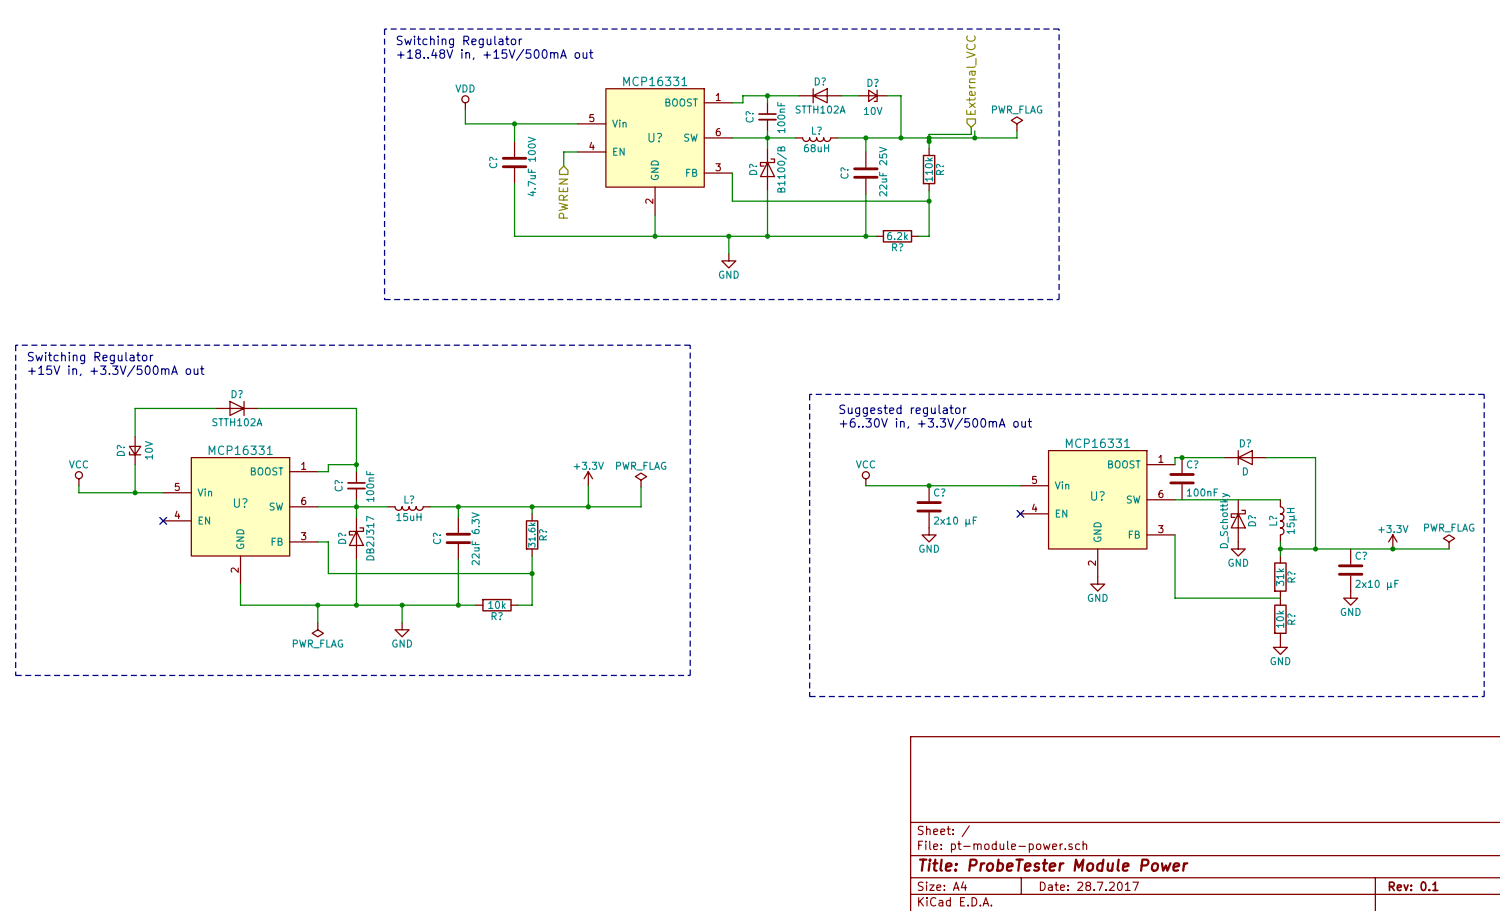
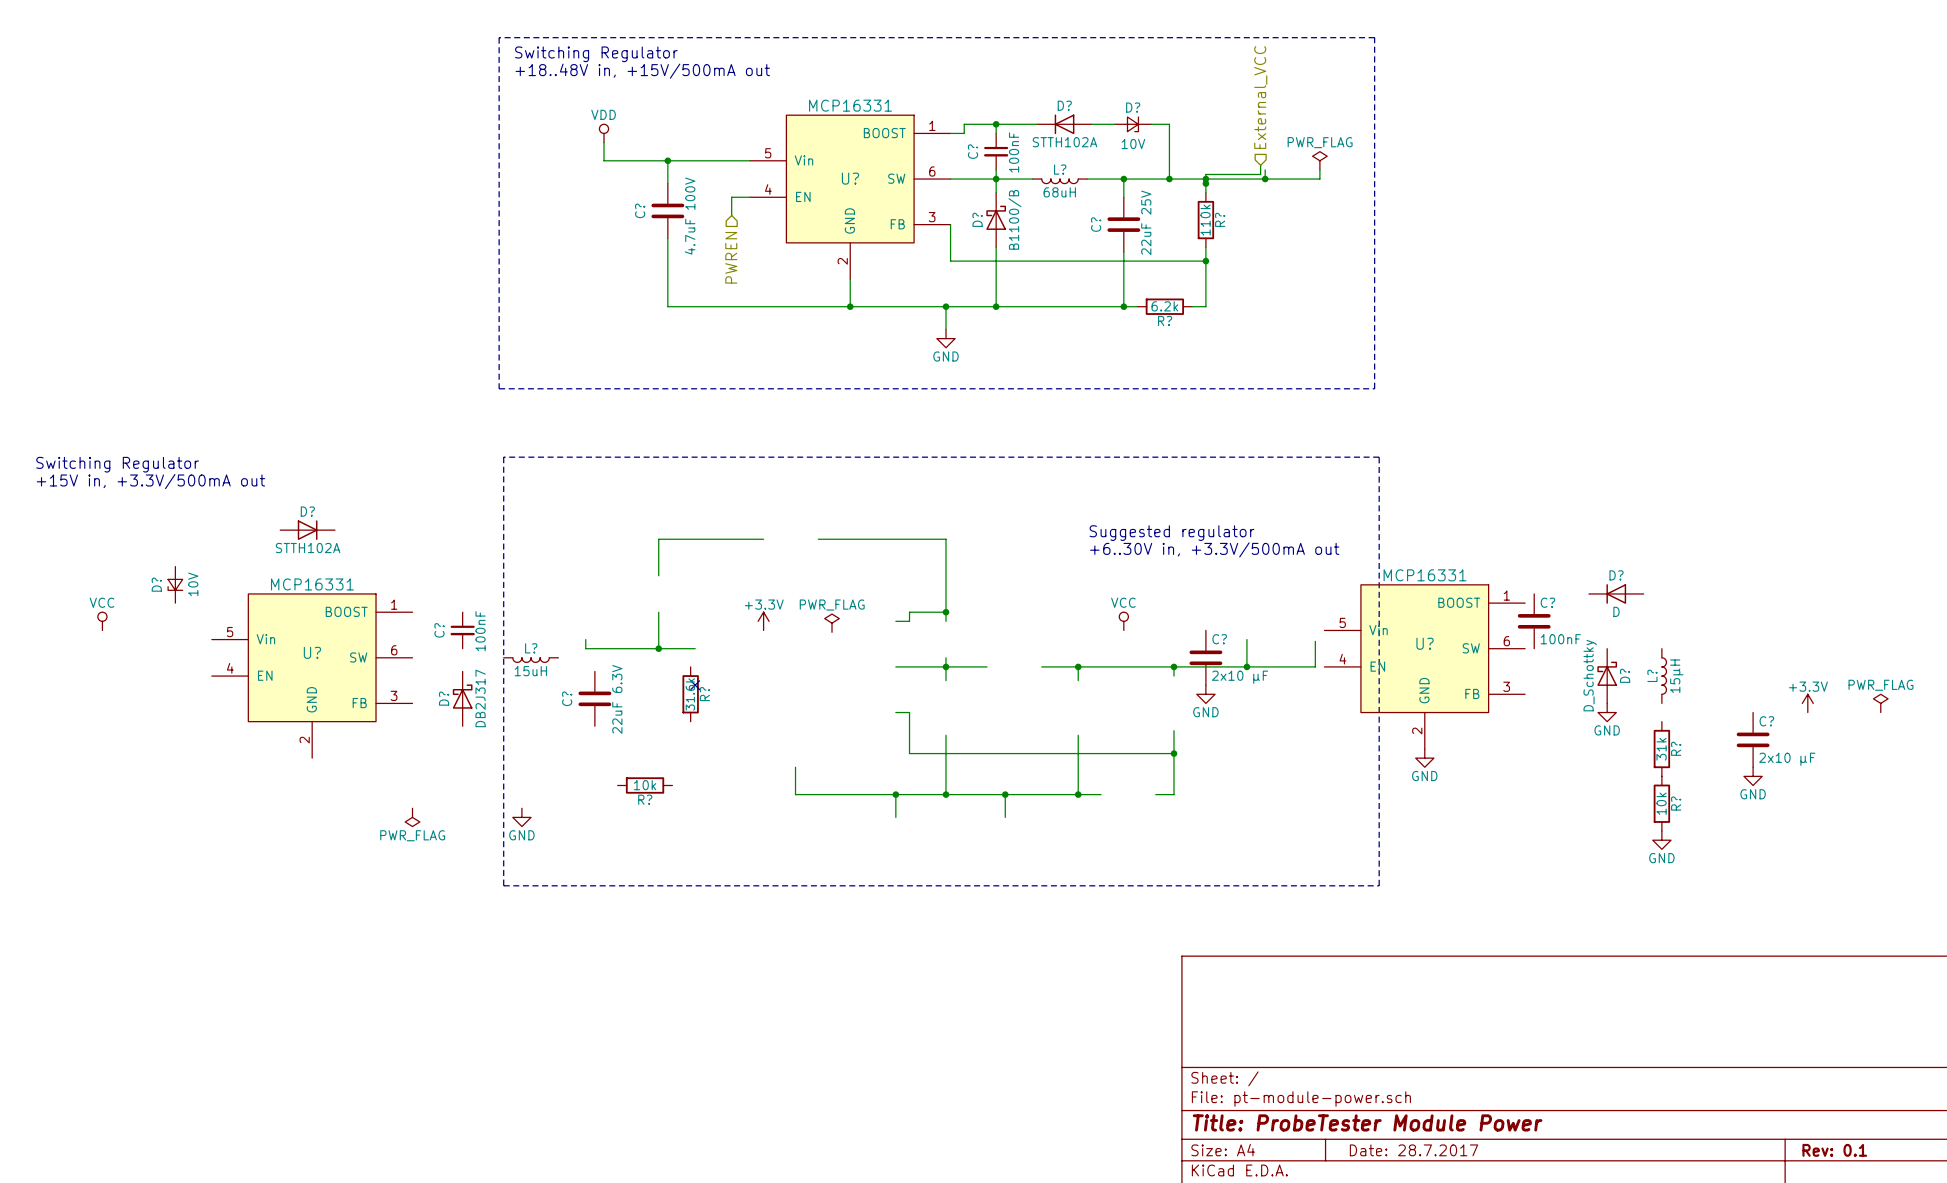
line: (15, 345) (15, 675) (690, 675) (690, 345) (15, 345) -> none
line: none -> (503, 457) (503, 885) (1379, 885) (1379, 457) (503, 457)
line: (809, 394) (809, 696) (1484, 696) (1484, 394) (809, 394) -> none
wire: (215, 408) (135, 408) (135, 436) -> none
wire: (258, 408) (356, 408) (356, 471) -> none
wire: none -> (763, 539) (658, 539) (658, 575)
wire: none -> (818, 539) (945, 539) (945, 621)
junction: (1182, 457) -> none
wire: (1224, 457) (1175, 457) (1175, 464) -> none
wire: (1266, 457) (1315, 457) (1315, 548) -> none
wire: (135, 464) (135, 492) -> none
wire: (356, 464) (328, 464) (328, 471) (317, 471) -> none
junction: (356, 464) -> none
wire: none -> (658, 612) (658, 648)
wire: none -> (945, 612) (909, 612) (909, 621) (895, 621)
junction: none -> (945, 612)
wire: (78, 485) (78, 492) (163, 492) -> none
wire: (588, 485) (588, 506) -> none
wire: (865, 485) (1020, 485) -> none
junction: (929, 485) -> none
wire: (641, 487) (641, 506) (430, 506) -> none
junction: (135, 492) -> none
wire: none -> (585, 639) (585, 648) (695, 648)
wire: none -> (1246, 639) (1246, 666)
wire: none -> (1315, 641) (1315, 666) (1041, 666)
wire: (356, 499) (356, 517) -> none
junction: none -> (658, 648)
wire: (1175, 499) (1280, 499) -> none
wire: (317, 506) (388, 506) -> none
junction: (356, 506) -> none
wire: (458, 506) (458, 517) -> none
junction: (458, 506) -> none
wire: (532, 506) (532, 513) -> none
junction: (532, 506) -> none
junction: (588, 506) -> none
wire: none -> (945, 657) (945, 680)
wire: none -> (895, 666) (987, 666)
junction: none -> (945, 666)
wire: none -> (1078, 666) (1078, 680)
junction: none -> (1078, 666)
wire: none -> (1173, 666) (1173, 676)
junction: none -> (1173, 666)
junction: none -> (1246, 666)
no-connect mark: (1020, 513) -> none
no-connect mark: (163, 520) -> none
no-connect mark: none -> (695, 685)
wire: (1175, 534) (1175, 598) (1280, 598) -> none
wire: (317, 541) (328, 541) (328, 573) (532, 573) -> none
wire: (1280, 541) (1280, 556) -> none
wire: none -> (895, 712) (909, 712) (909, 753) (1173, 753)
wire: (1280, 548) (1449, 548) -> none
junction: (1280, 548) -> none
junction: (1315, 548) -> none
junction: (1392, 548) -> none
wire: (532, 556) (532, 605) (518, 605) -> none
wire: (356, 559) (356, 605) -> none
wire: (458, 559) (458, 605) -> none
wire: none -> (1173, 730) (1173, 794) (1155, 794)
wire: none -> (945, 735) (945, 794)
wire: none -> (1078, 735) (1078, 794)
junction: (532, 573) -> none
junction: none -> (1173, 753)
wire: (240, 584) (240, 605) (475, 605) -> none
wire: none -> (795, 767) (795, 794) (1101, 794)
wire: (317, 605) (317, 622) -> none
junction: (317, 605) -> none
junction: (356, 605) -> none
wire: (402, 605) (402, 622) -> none
junction: (402, 605) -> none
junction: (458, 605) -> none
junction: none -> (895, 794)
junction: none -> (945, 794)
wire: none -> (1005, 794) (1005, 817)
junction: none -> (1005, 794)
junction: none -> (1078, 794)

